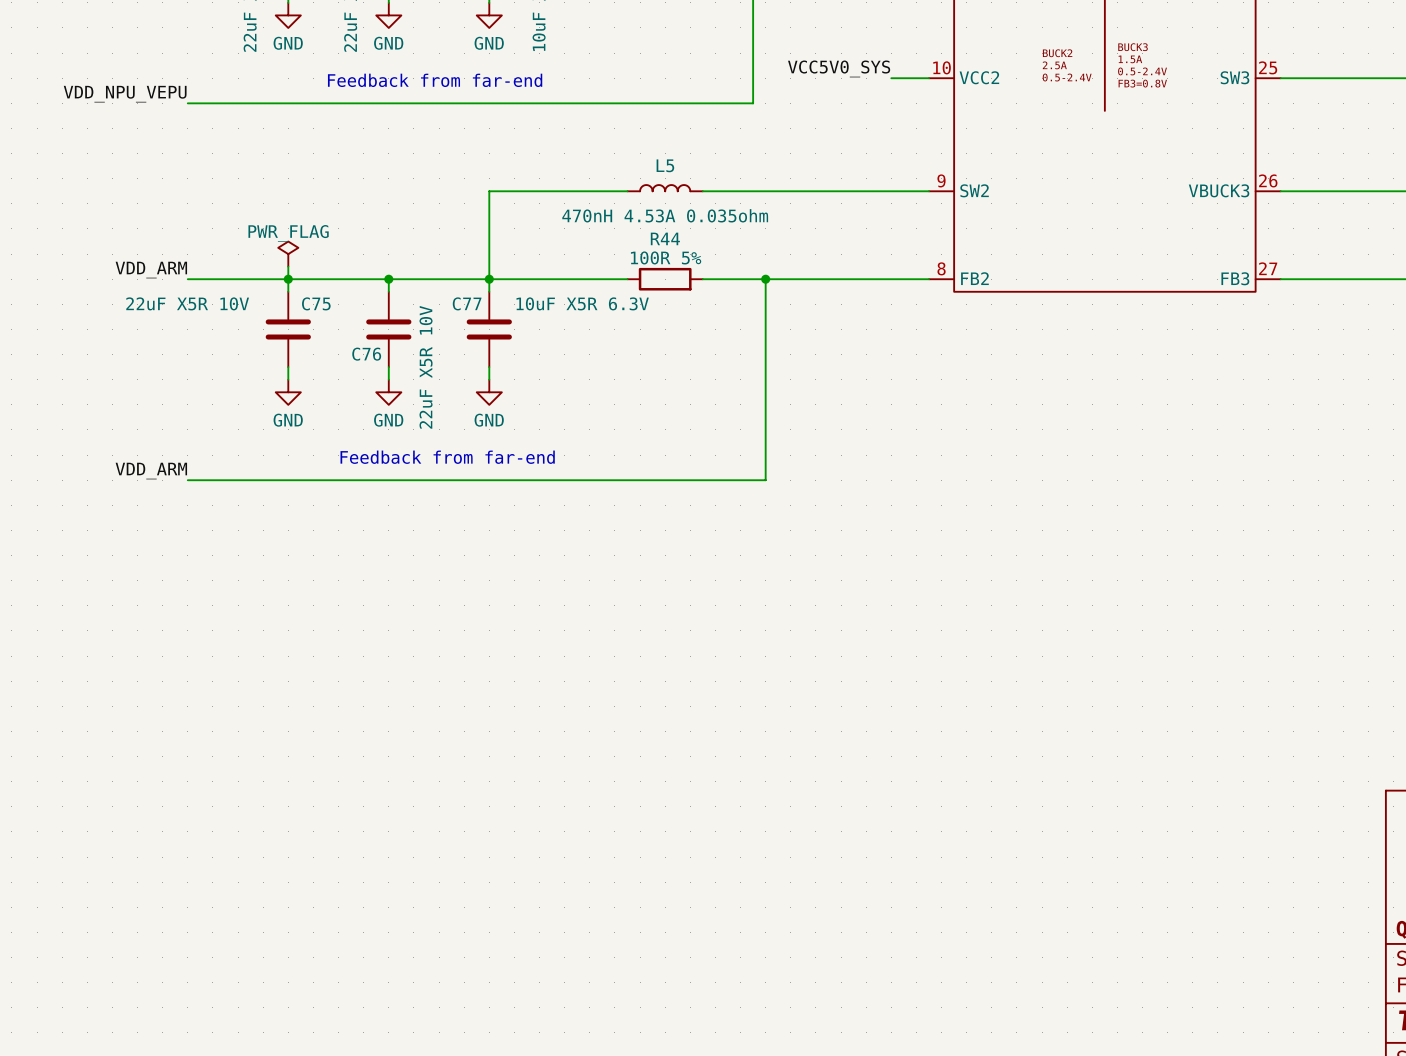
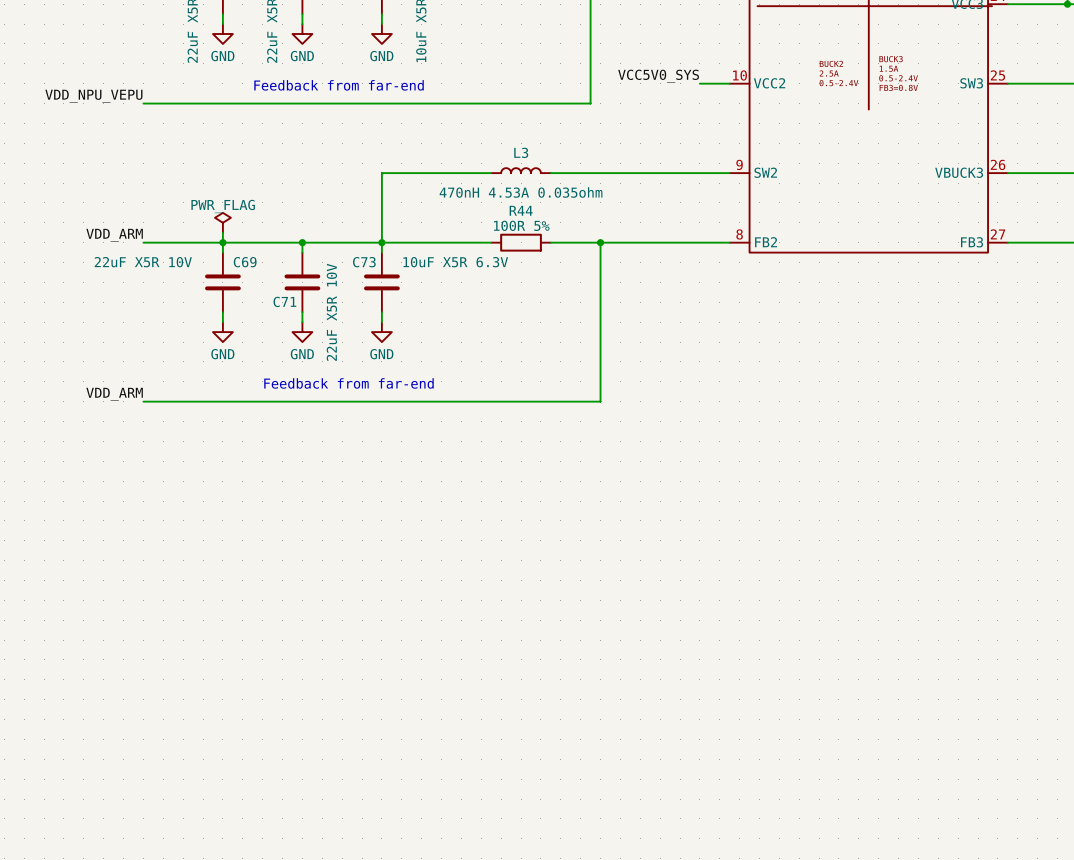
L5 name: L5 (665, 165) -> L3 (521, 152)
C75 name: C75 (316, 303) -> C69 (245, 262)
C77 name: C77 (467, 303) -> C73 (364, 262)
C76 name: C76 (366, 354) -> C71 (284, 301)

